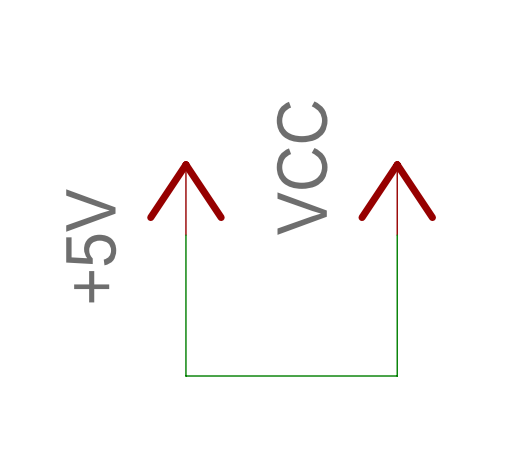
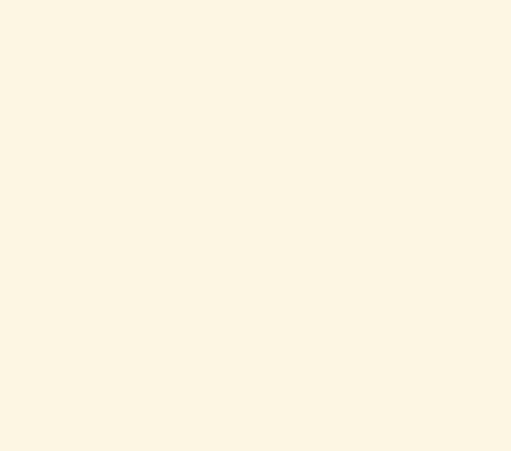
power symbol: +5V (185, 198) -> none
power symbol: VCC (397, 198) -> none
wire: (185, 235) (185, 376) (397, 376) (397, 235) -> none

